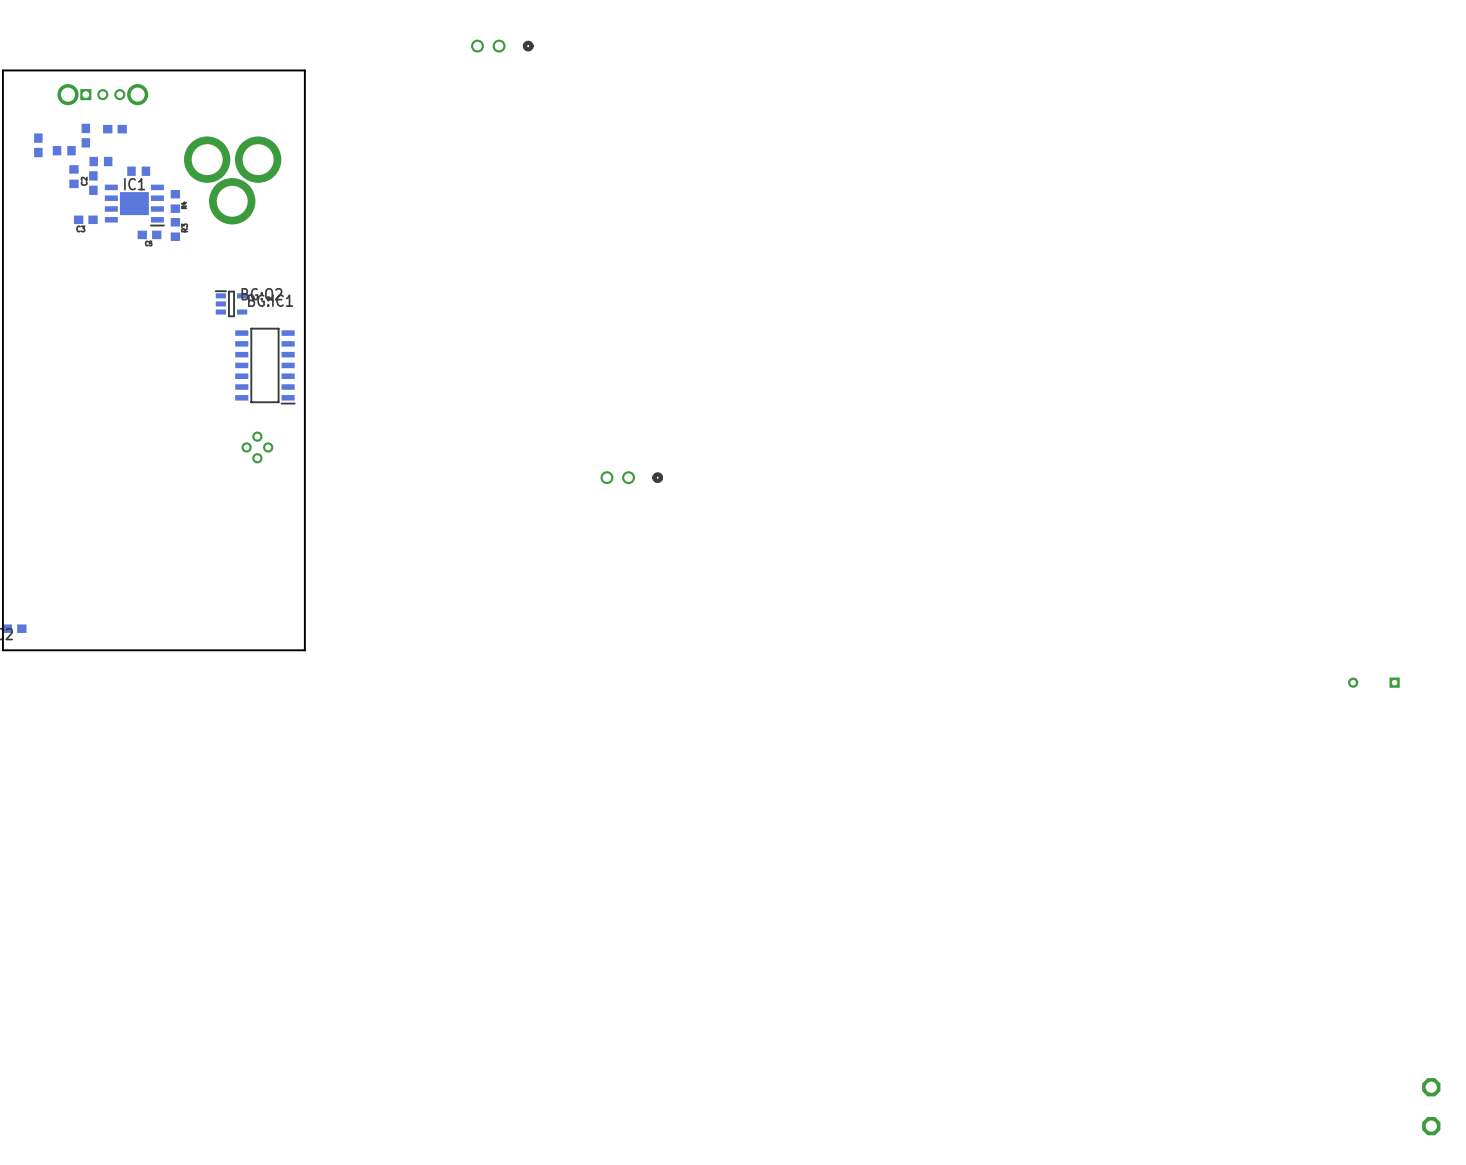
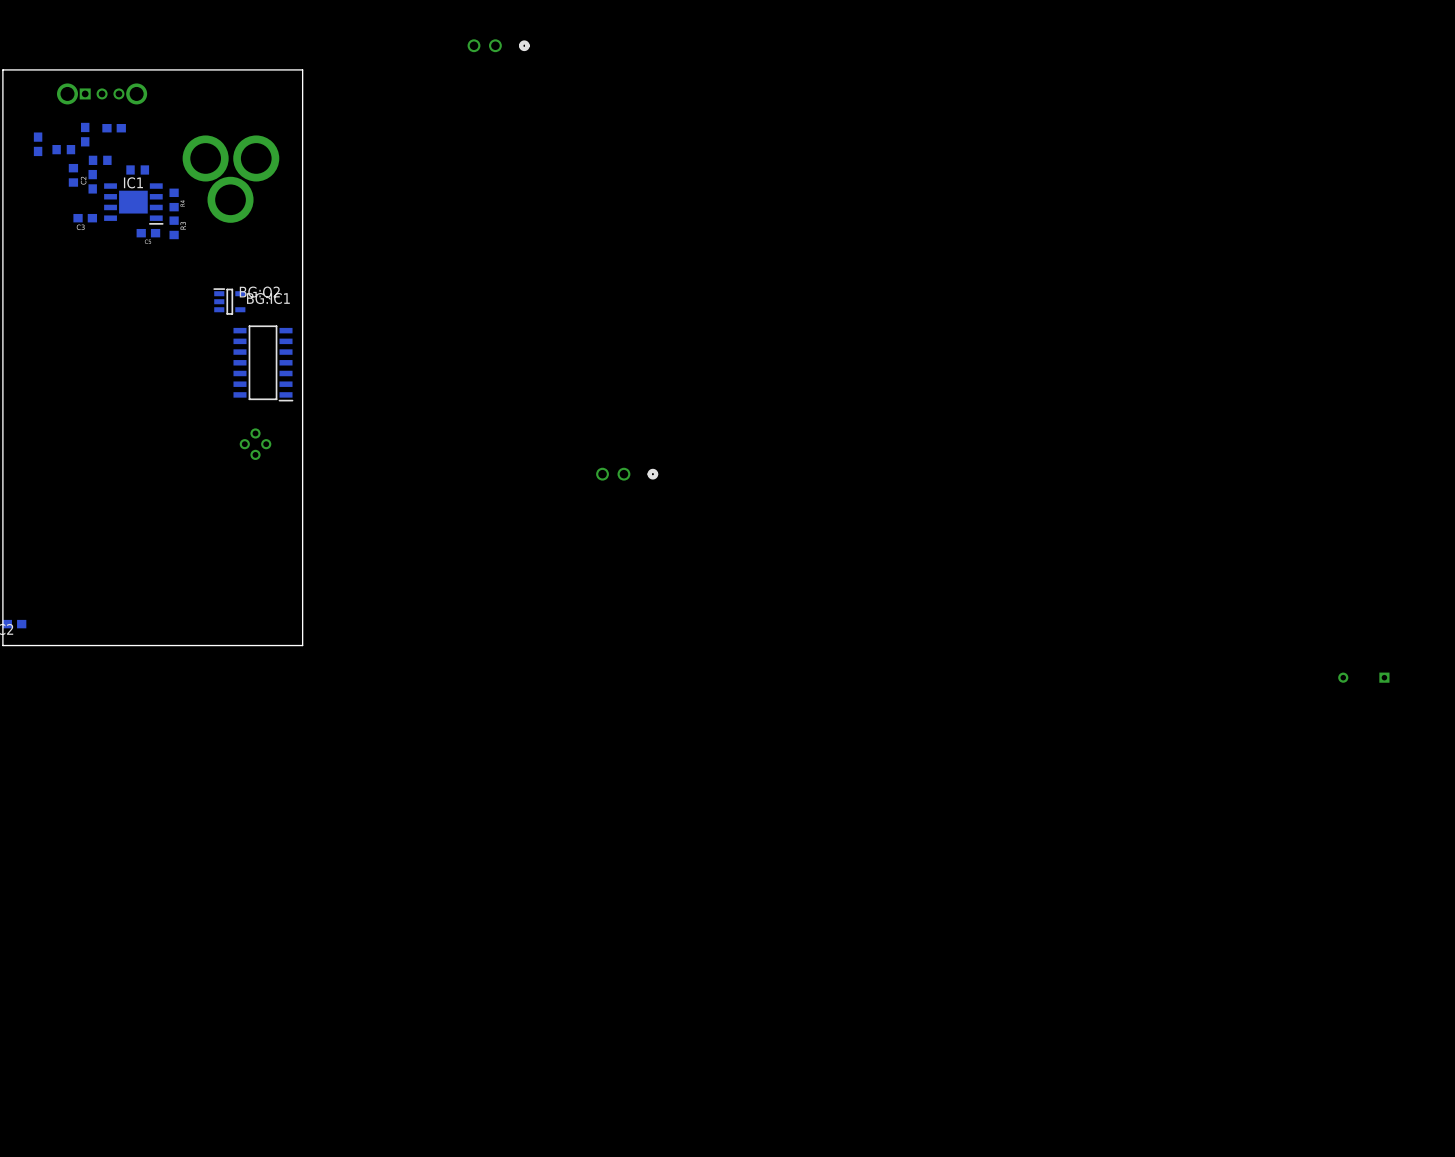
part: (1431, 1087) -> none
part: (1431, 1126) -> none

